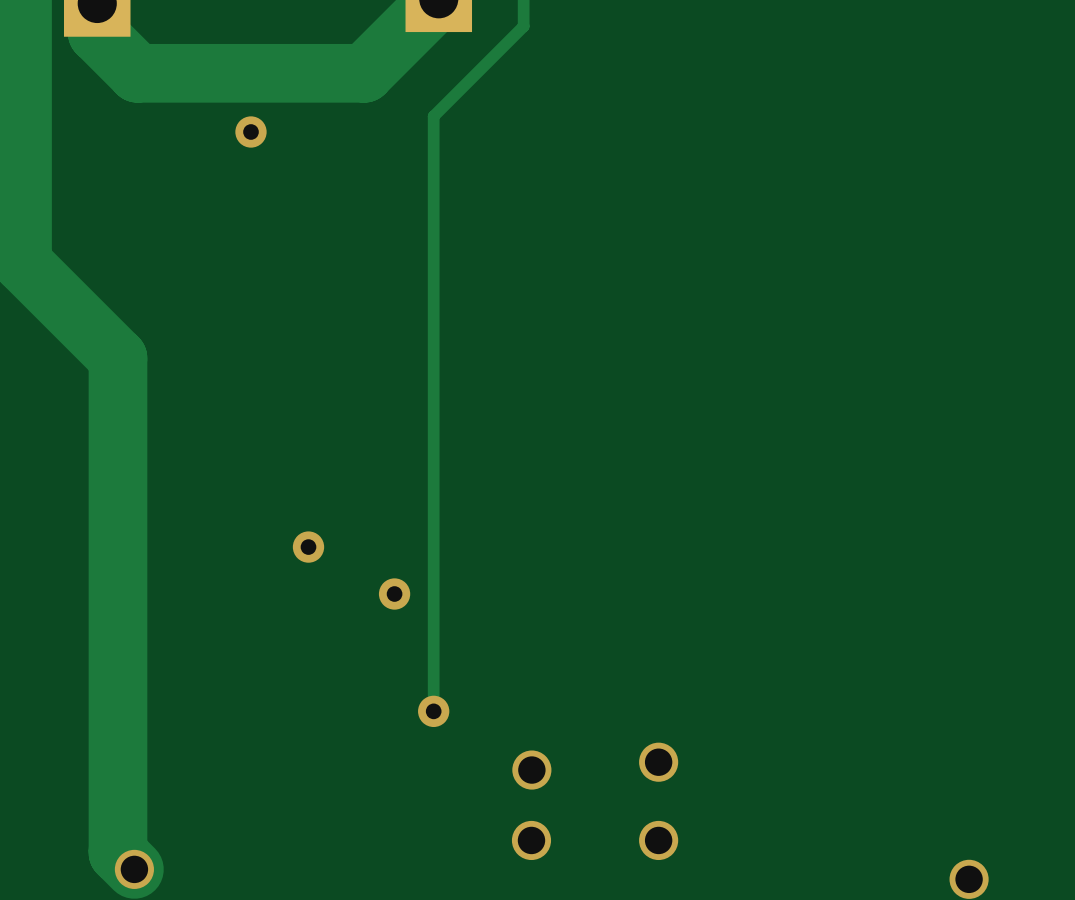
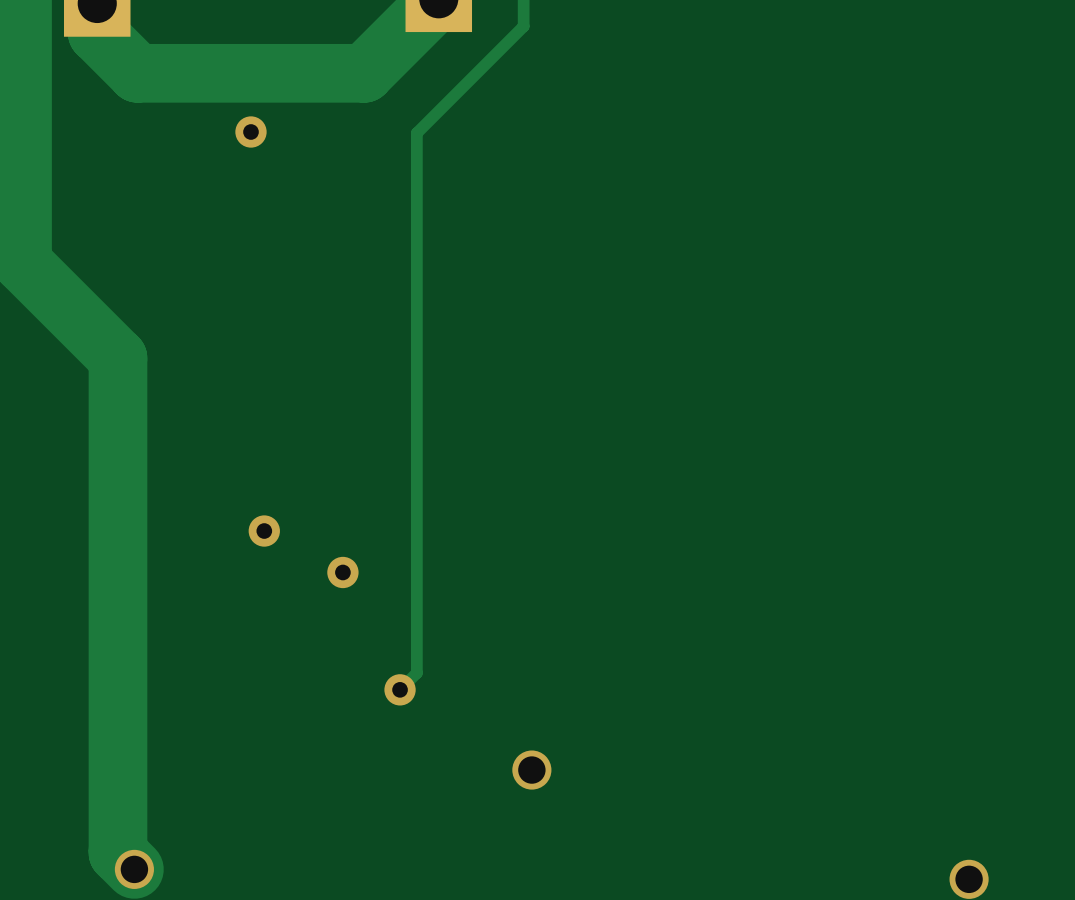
track: (433, 116) (433, 711) -> (433, 116) (416, 133) (416, 673) (400, 689)
via: none -> (264, 531)
via: (308, 547) -> none
via: none -> (342, 572)
via: (394, 594) -> none
via position: (433, 711) -> (400, 689)
via: (658, 762) -> none
via: (531, 840) -> none
via: (658, 840) -> none

